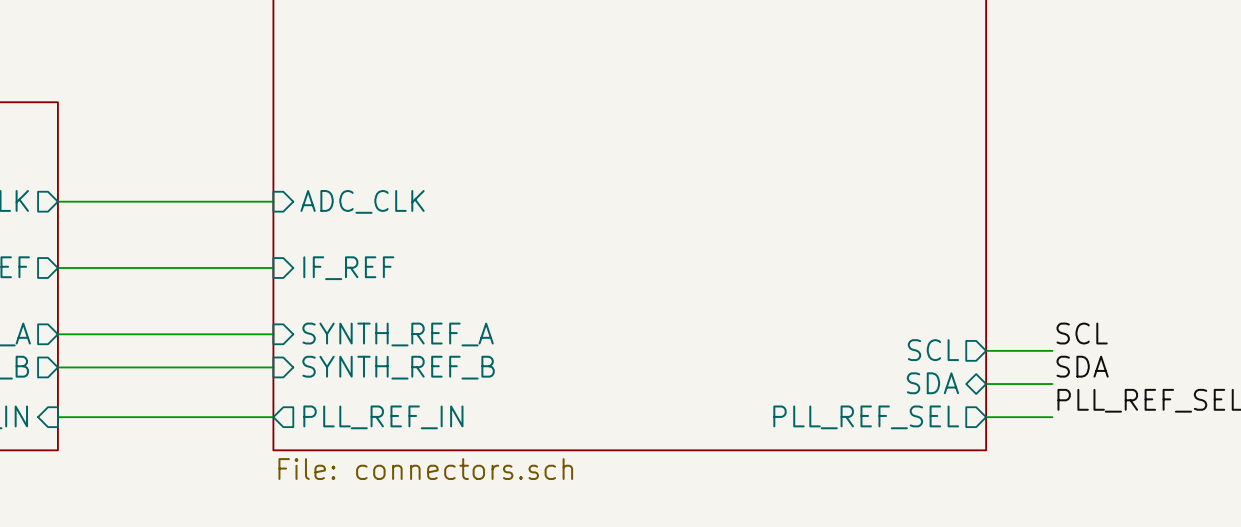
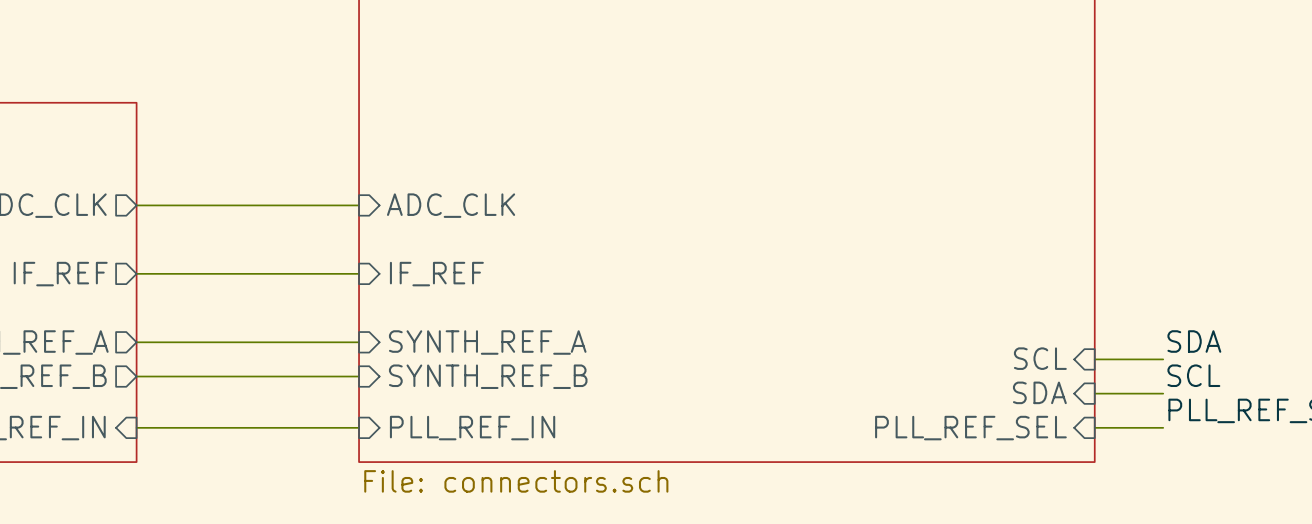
label: SCL (1082, 333) -> SDA (1194, 341)
sheet pin shape: output (933, 350) -> input (1040, 358)
label: SDA (1082, 366) -> SCL (1193, 375)
sheet pin shape: bidirectional (932, 383) -> input (1039, 392)
sheet pin shape: output (383, 417) -> input (472, 428)
sheet pin shape: output (866, 417) -> input (970, 428)

